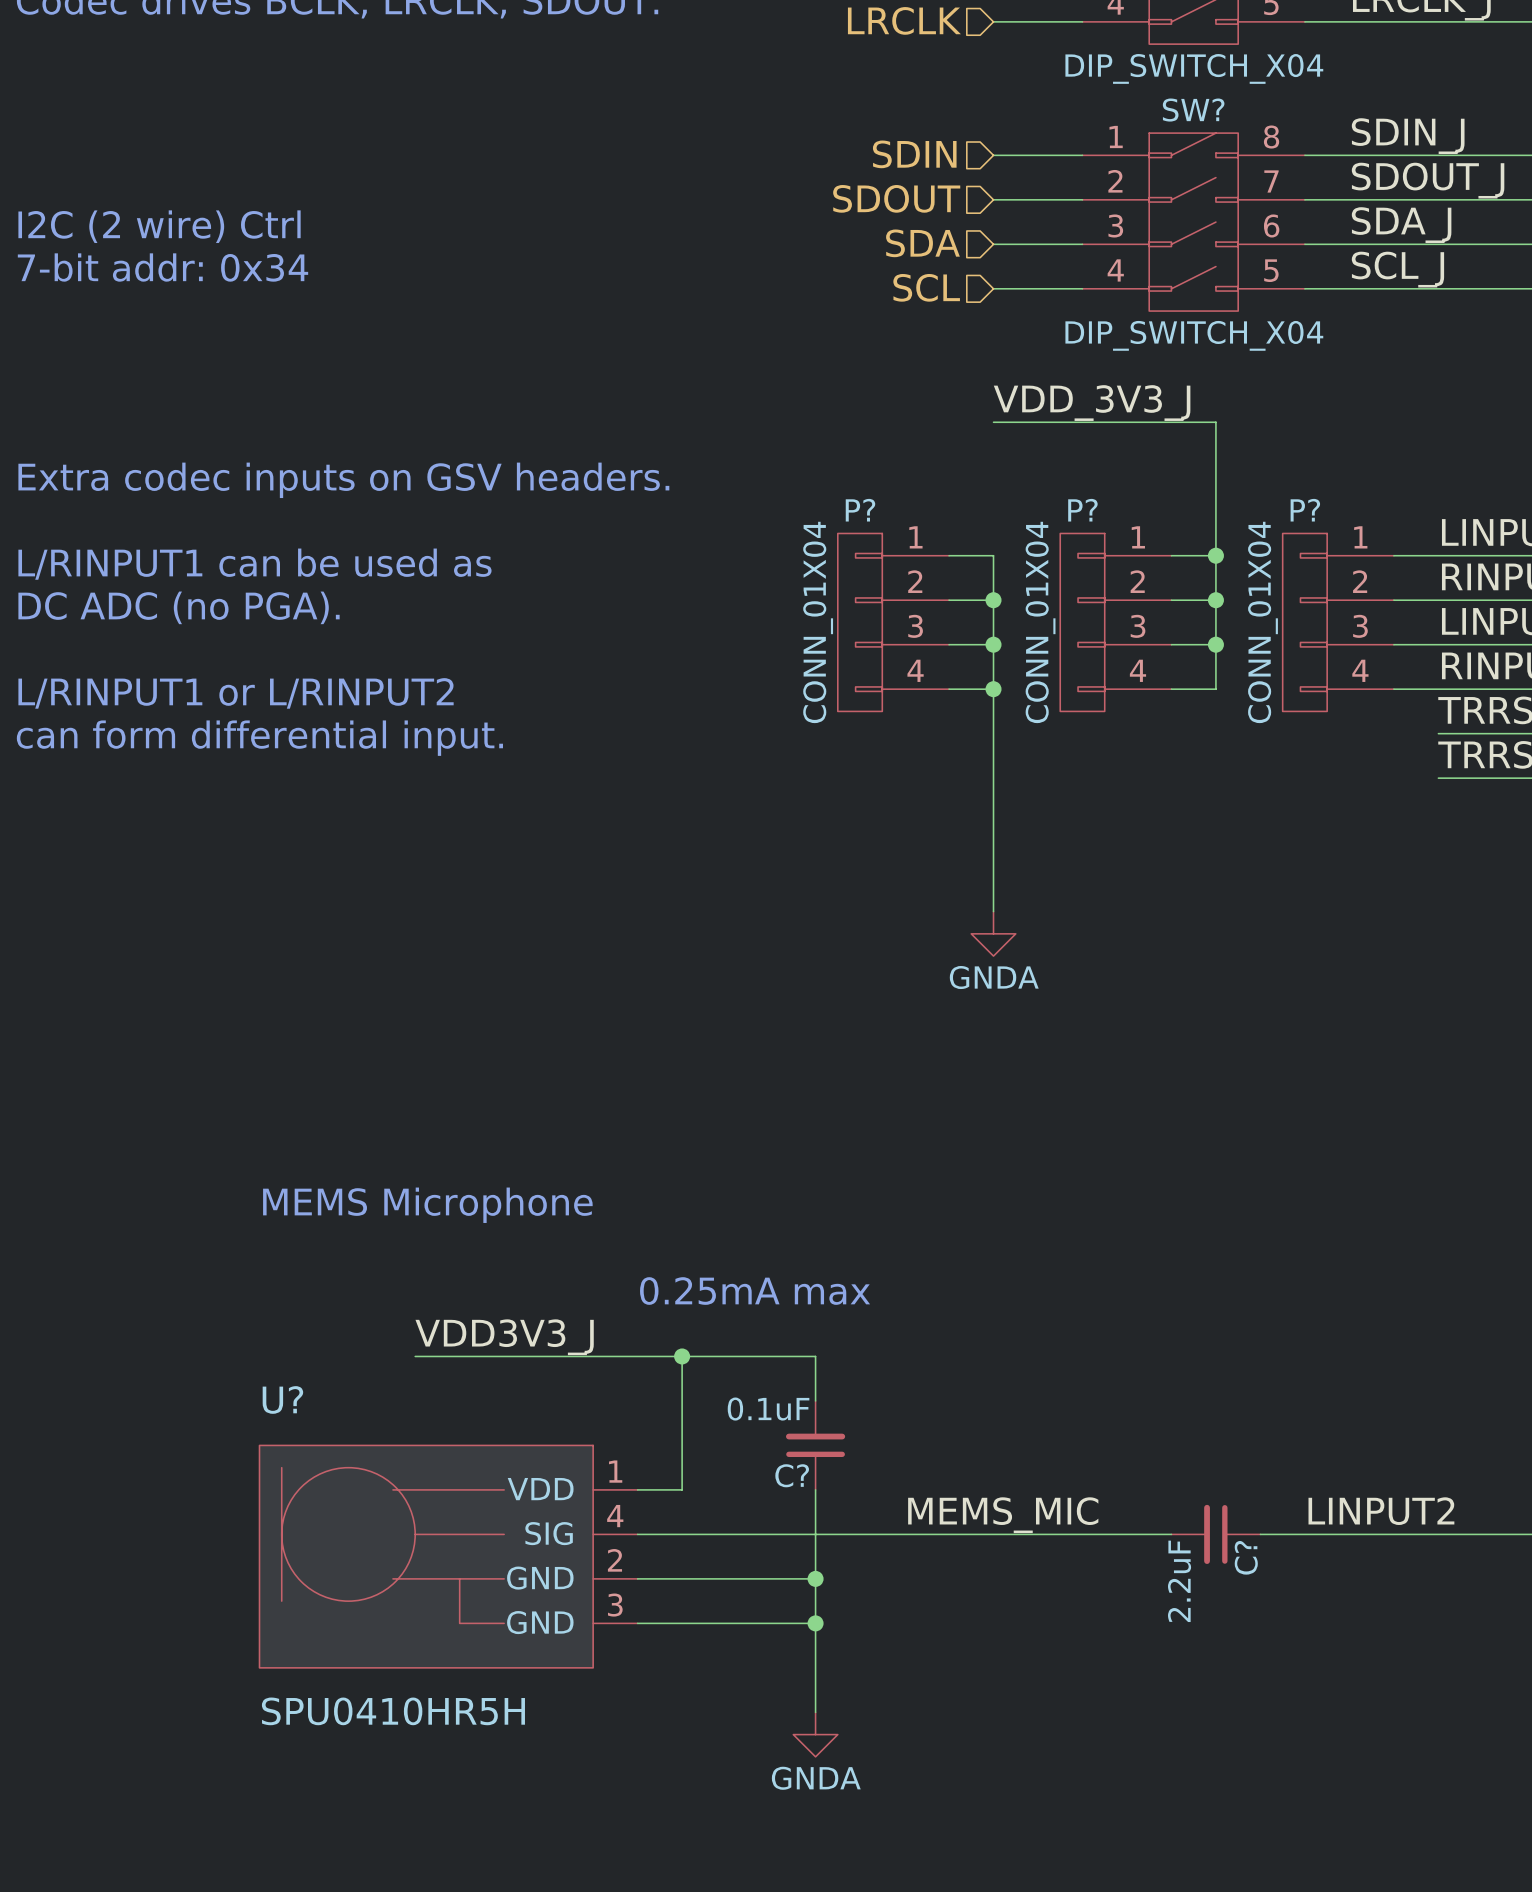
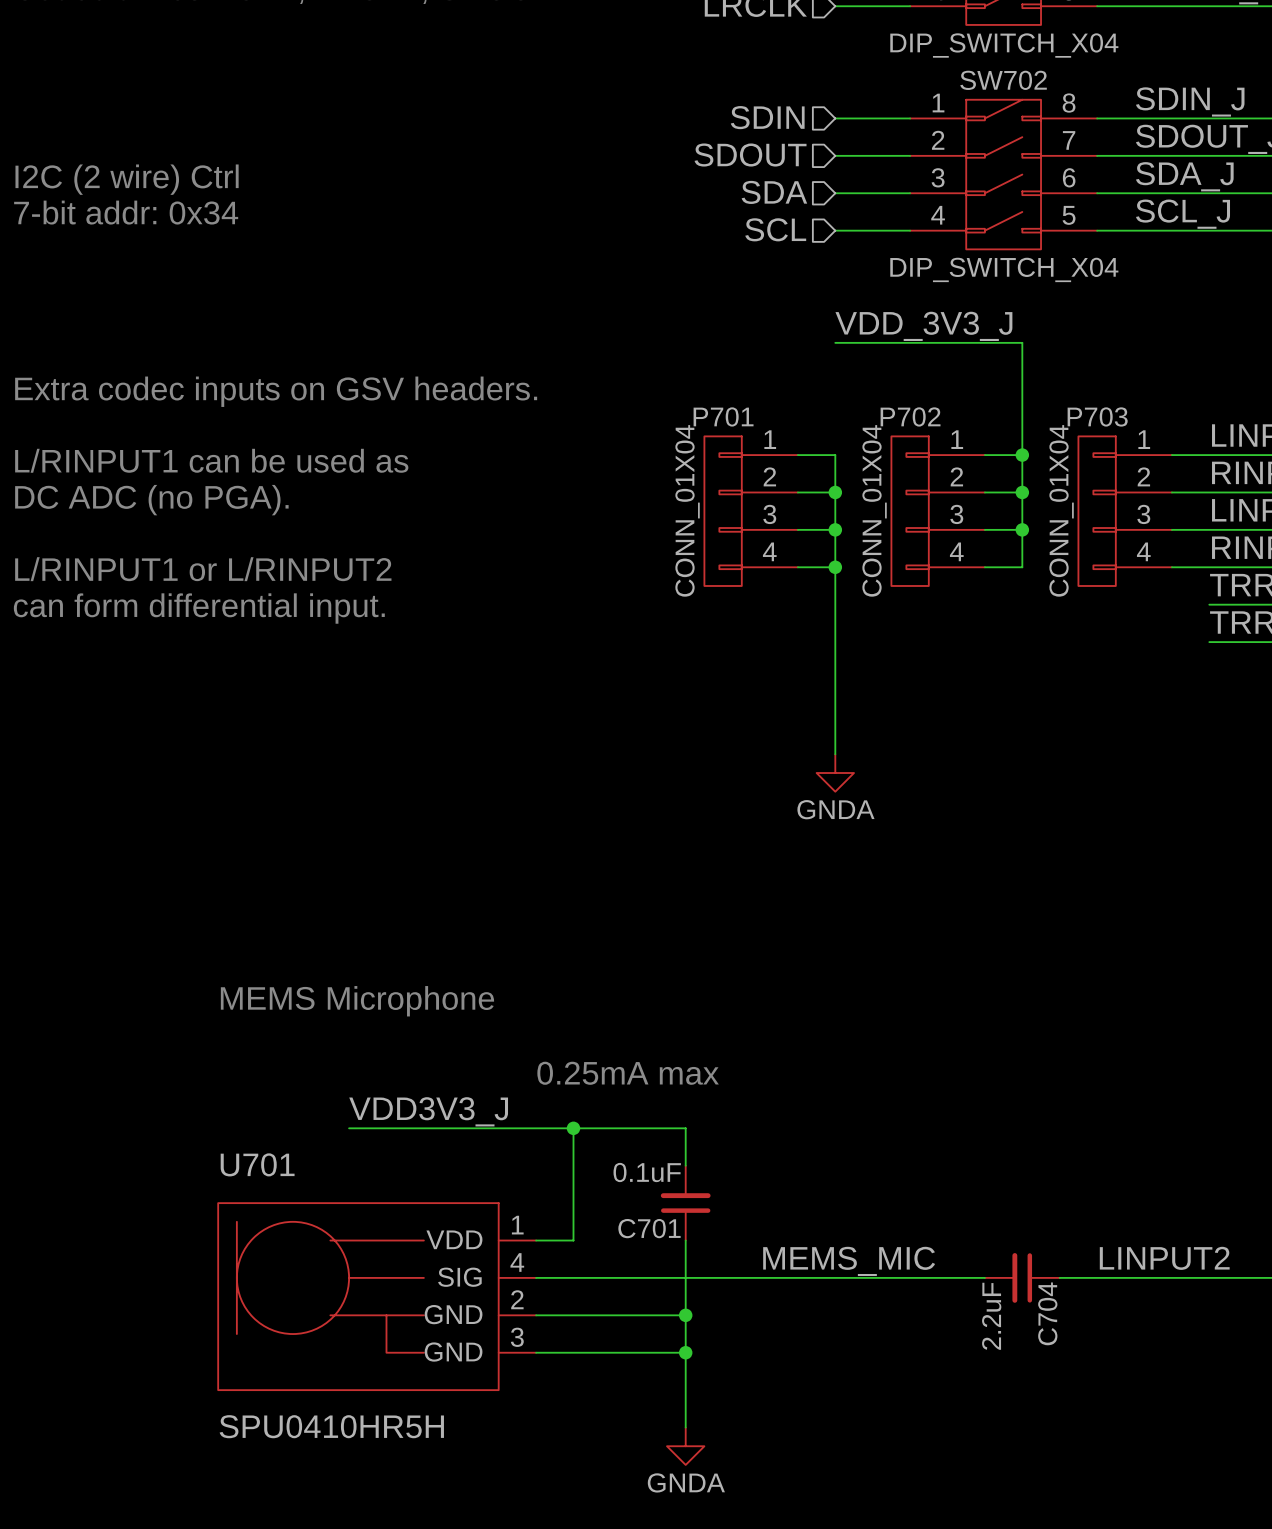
SW? name: SW? (1193, 110) -> SW702 (1003, 80)
P? name: P? (860, 510) -> P701 (723, 416)
P? name: P? (1082, 510) -> P702 (910, 416)
P? name: P? (1305, 510) -> P703 (1097, 416)
U? name: U? (282, 1399) -> U701 (257, 1164)
C? name: C? (792, 1475) -> C701 (649, 1228)
C? name: C? (1246, 1557) -> C704 (1047, 1313)

